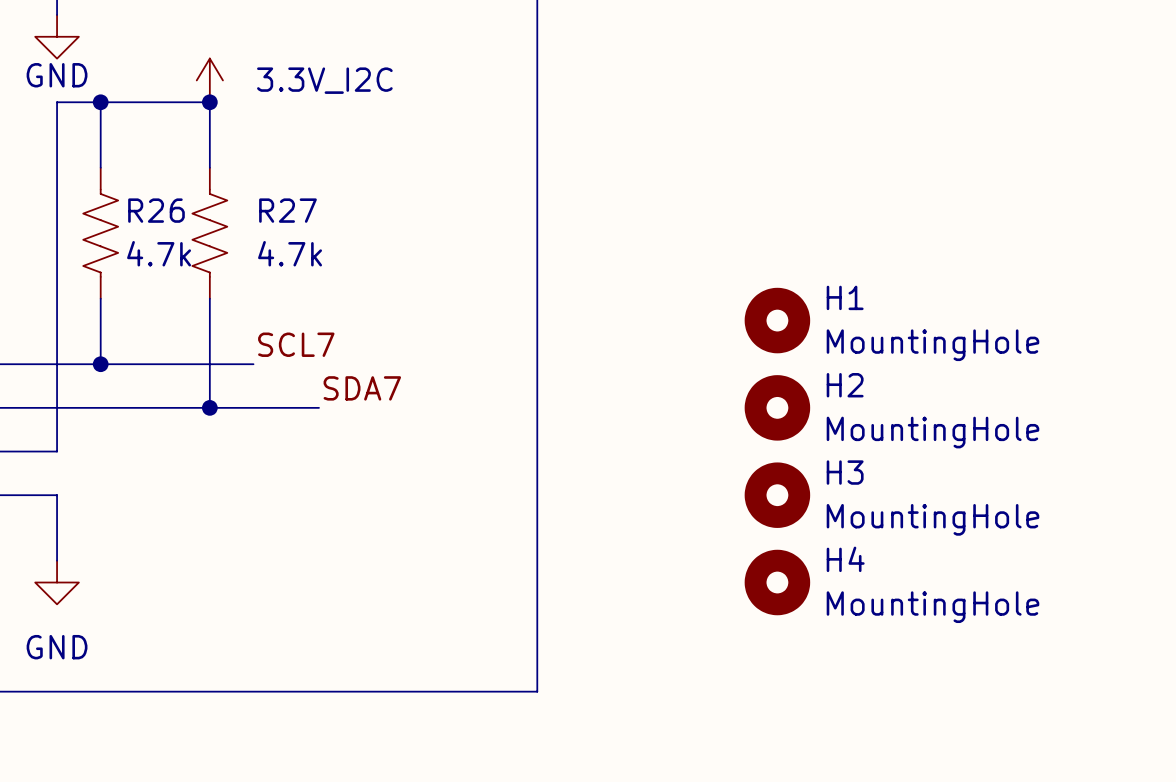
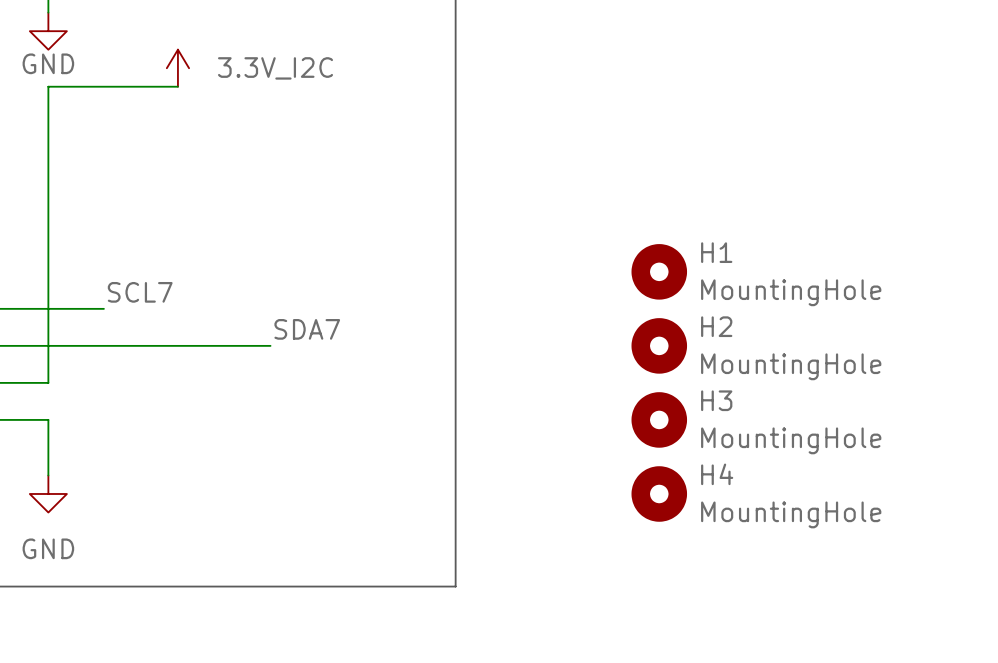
wire: (100, 102) (100, 167) -> none
junction: (100, 102) -> none
wire: (209, 102) (209, 167) -> none
junction: (209, 102) -> none
R26: 4.7k (100, 233) -> none
R27: 4.7k (209, 233) -> none
wire: (100, 298) (100, 364) -> none
wire: (209, 298) (209, 407) -> none
label position: SCL7 (296, 344) -> SCL7 (140, 292)
junction: (100, 364) -> none
wire: (122, 364) (253, 364) -> none
junction: (209, 407) -> none

